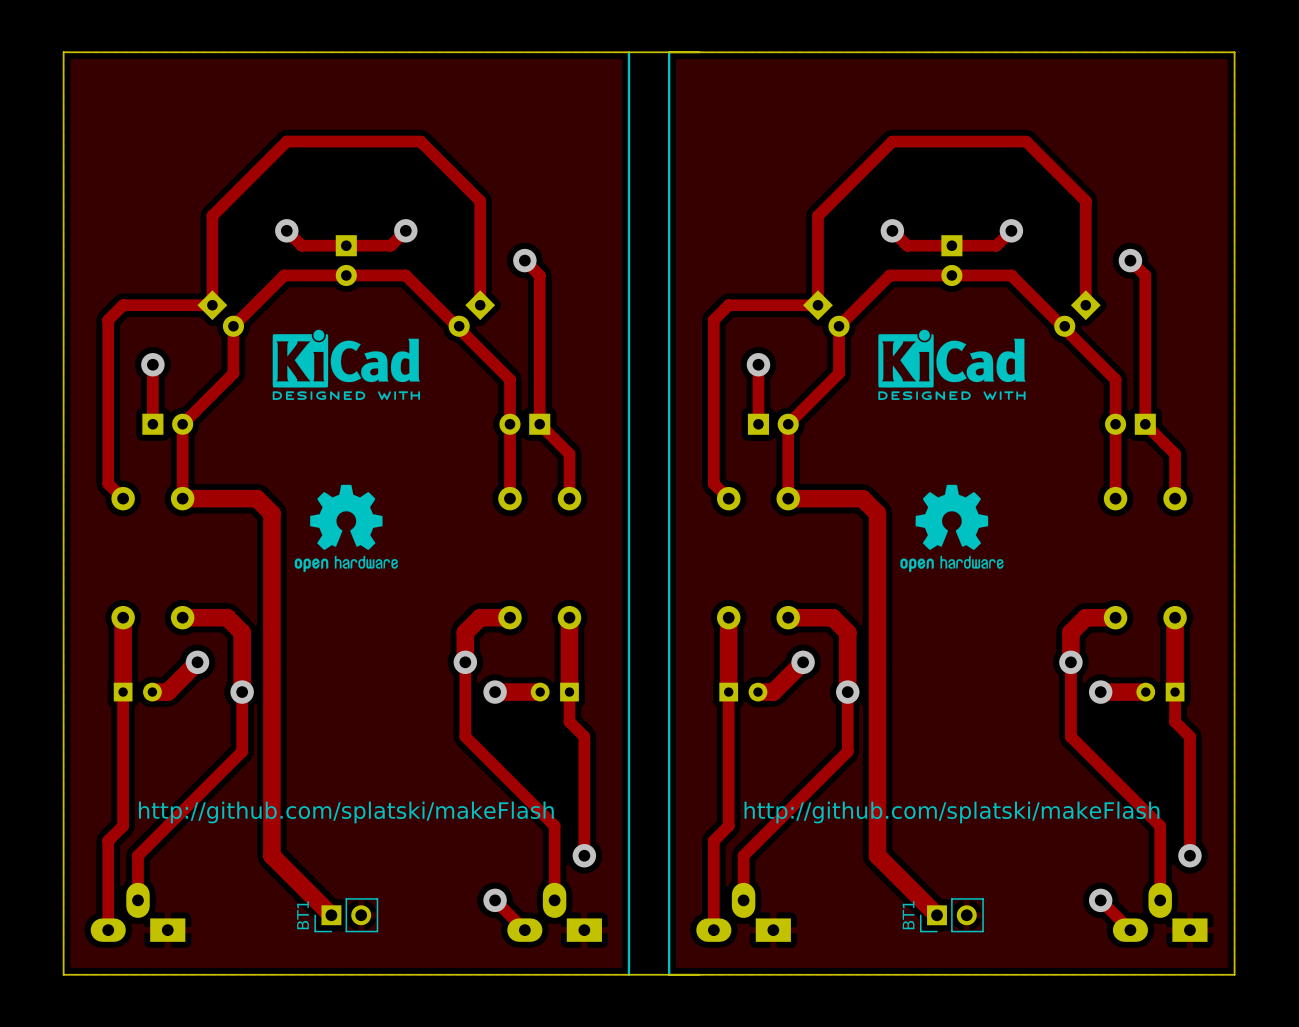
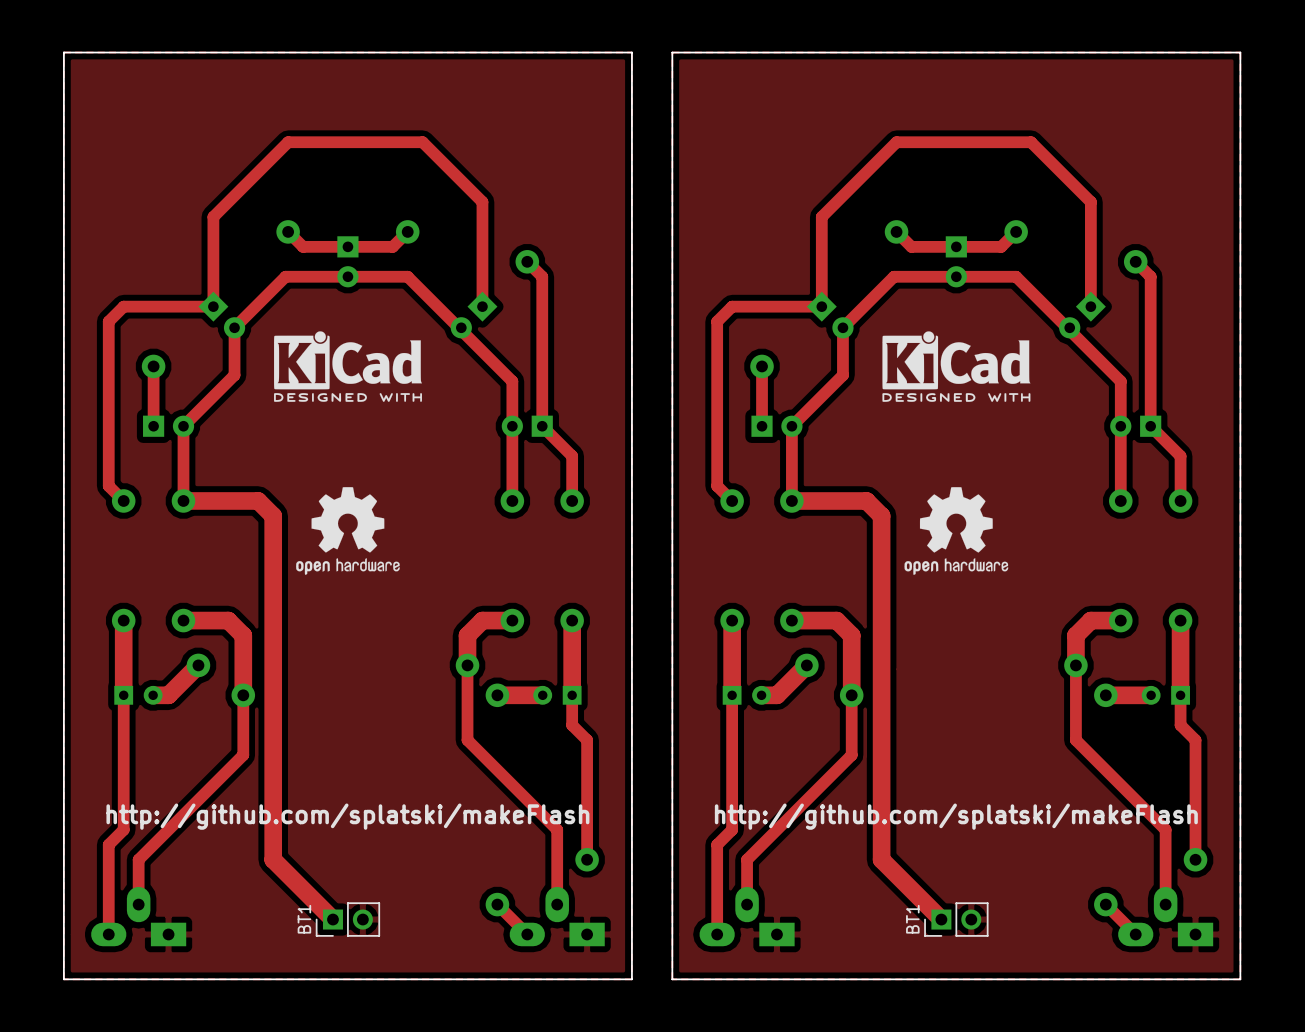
line: (628, 52) (628, 974) -> none
board edge: (629, 52) (699, 52) -> (631, 52) (631, 979)
line: (669, 52) (669, 974) -> none
board edge: none -> (672, 52) (672, 979)
board edge: (629, 974) (699, 974) -> none

